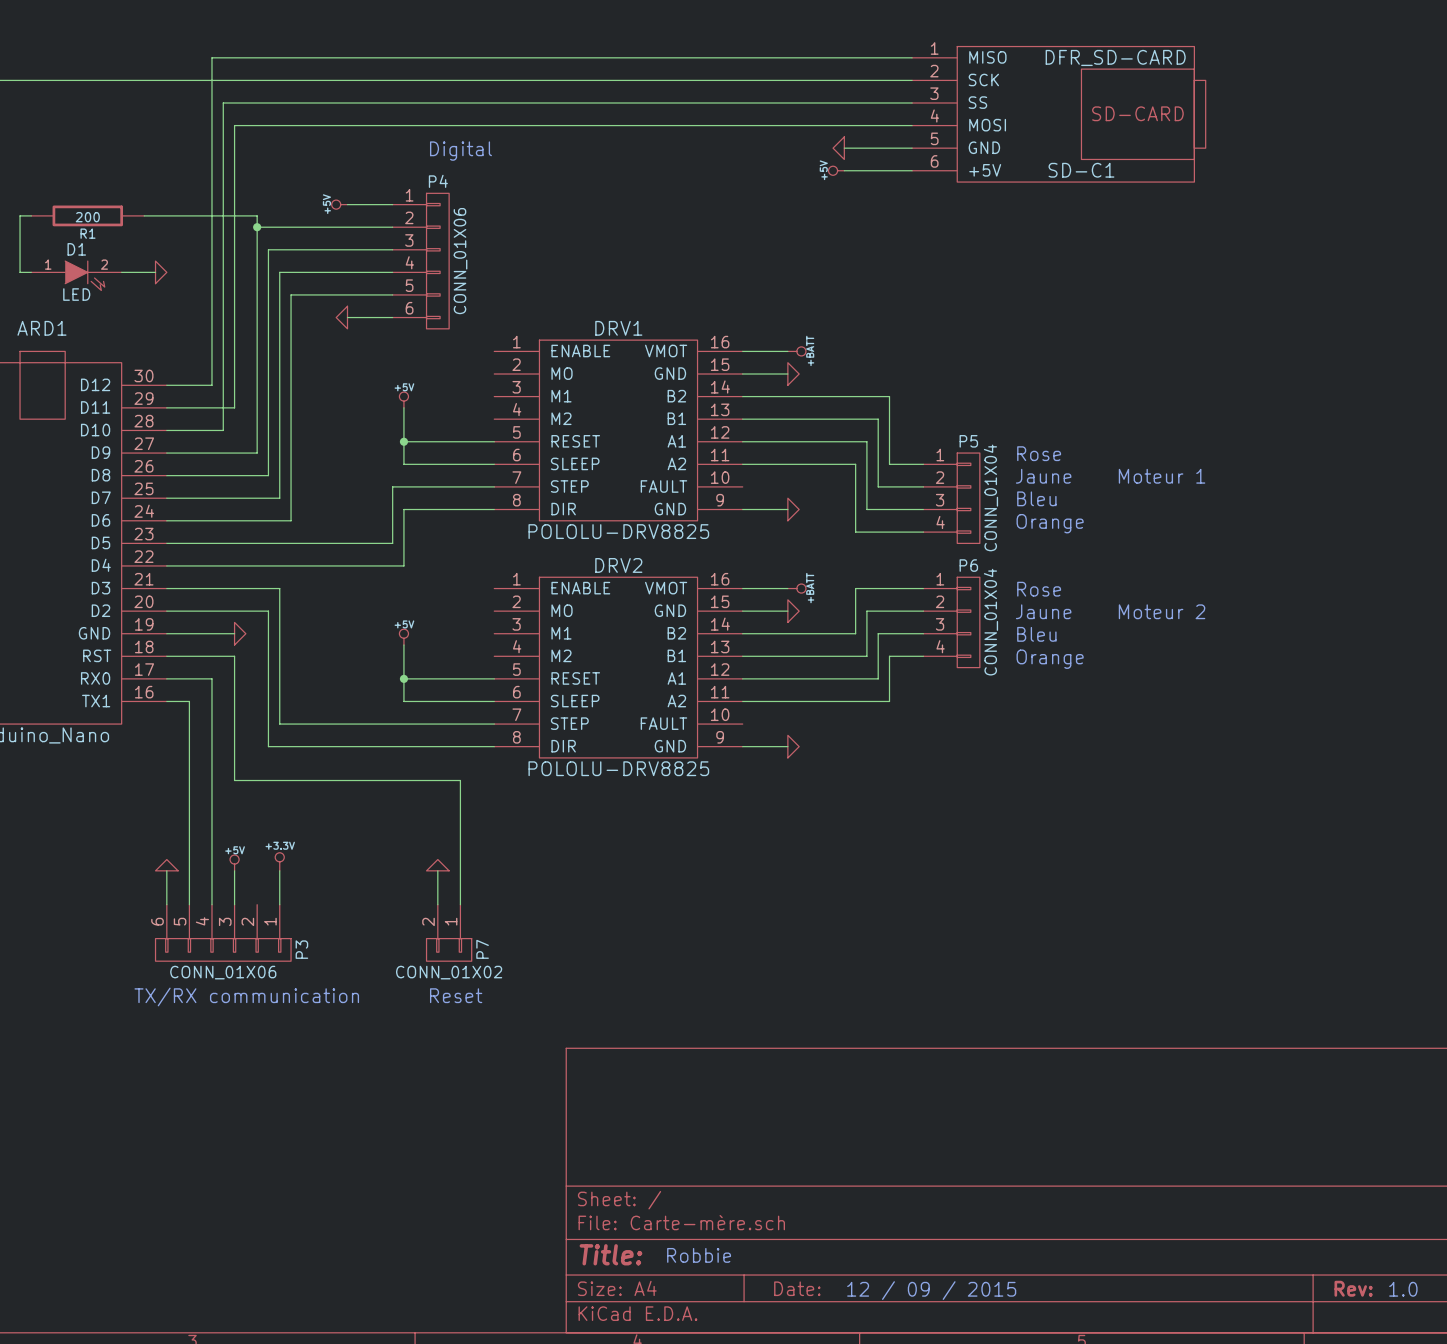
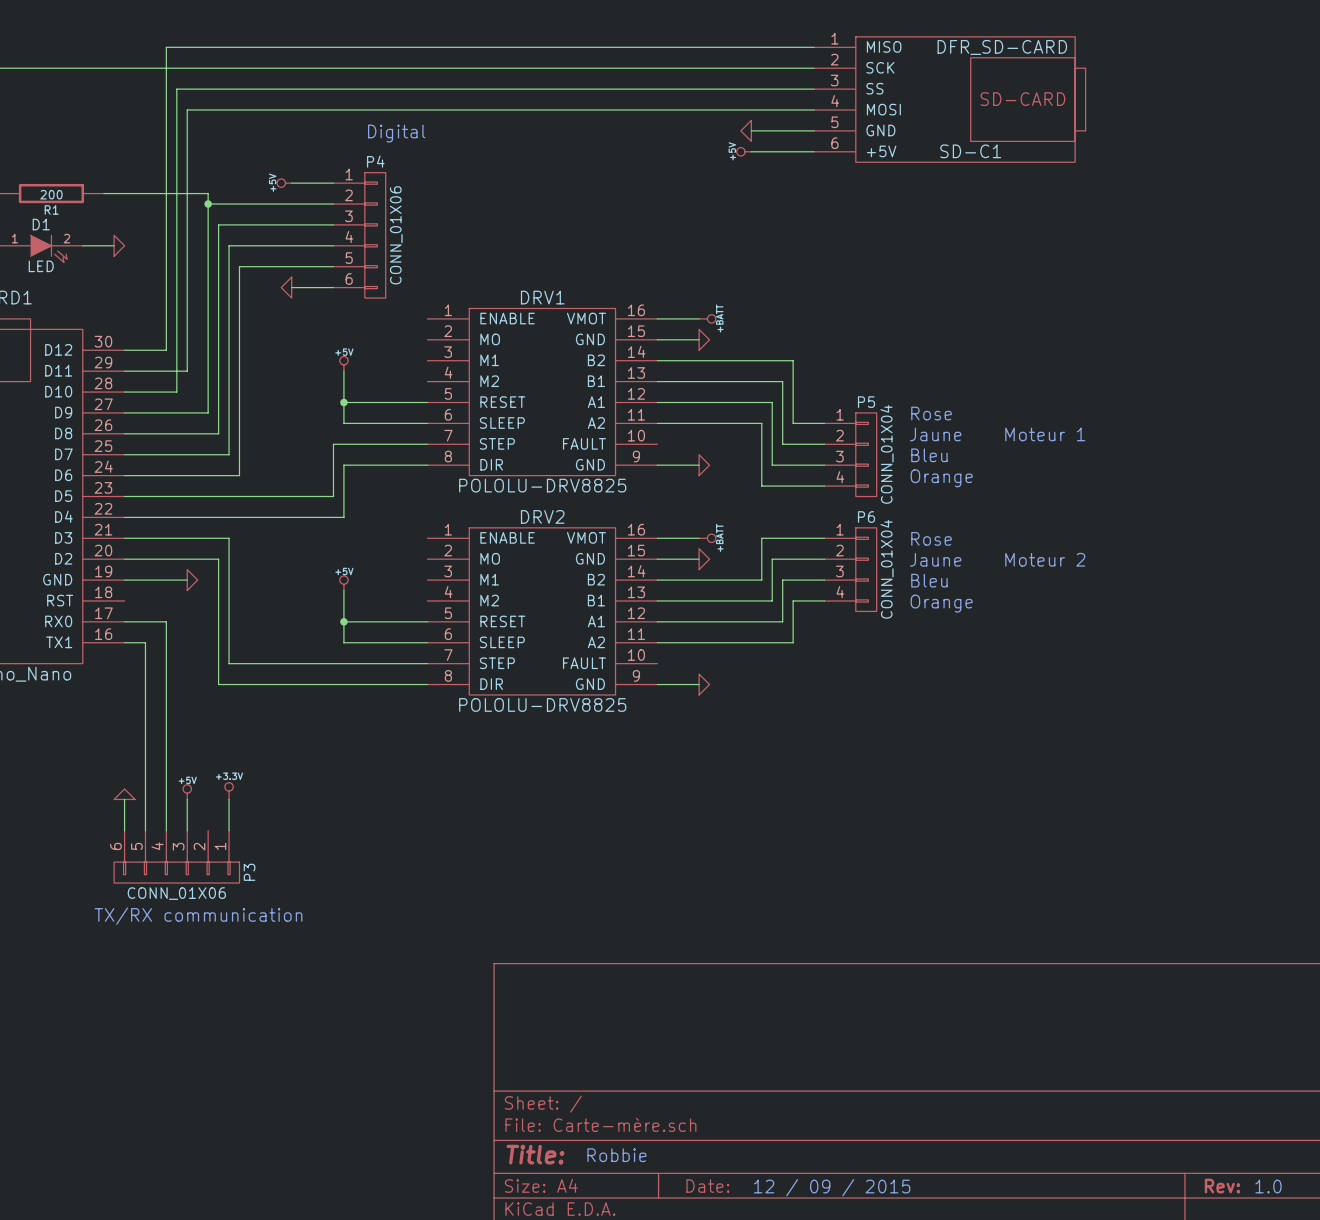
wire: (166, 656) (234, 656) (234, 780) (460, 780) (460, 904) -> none
power symbol: (437, 865) -> none
wire: (437, 870) (437, 904) -> none
P7: CONN_01X02 (449, 932) -> none
text: Reset (456, 995) -> none

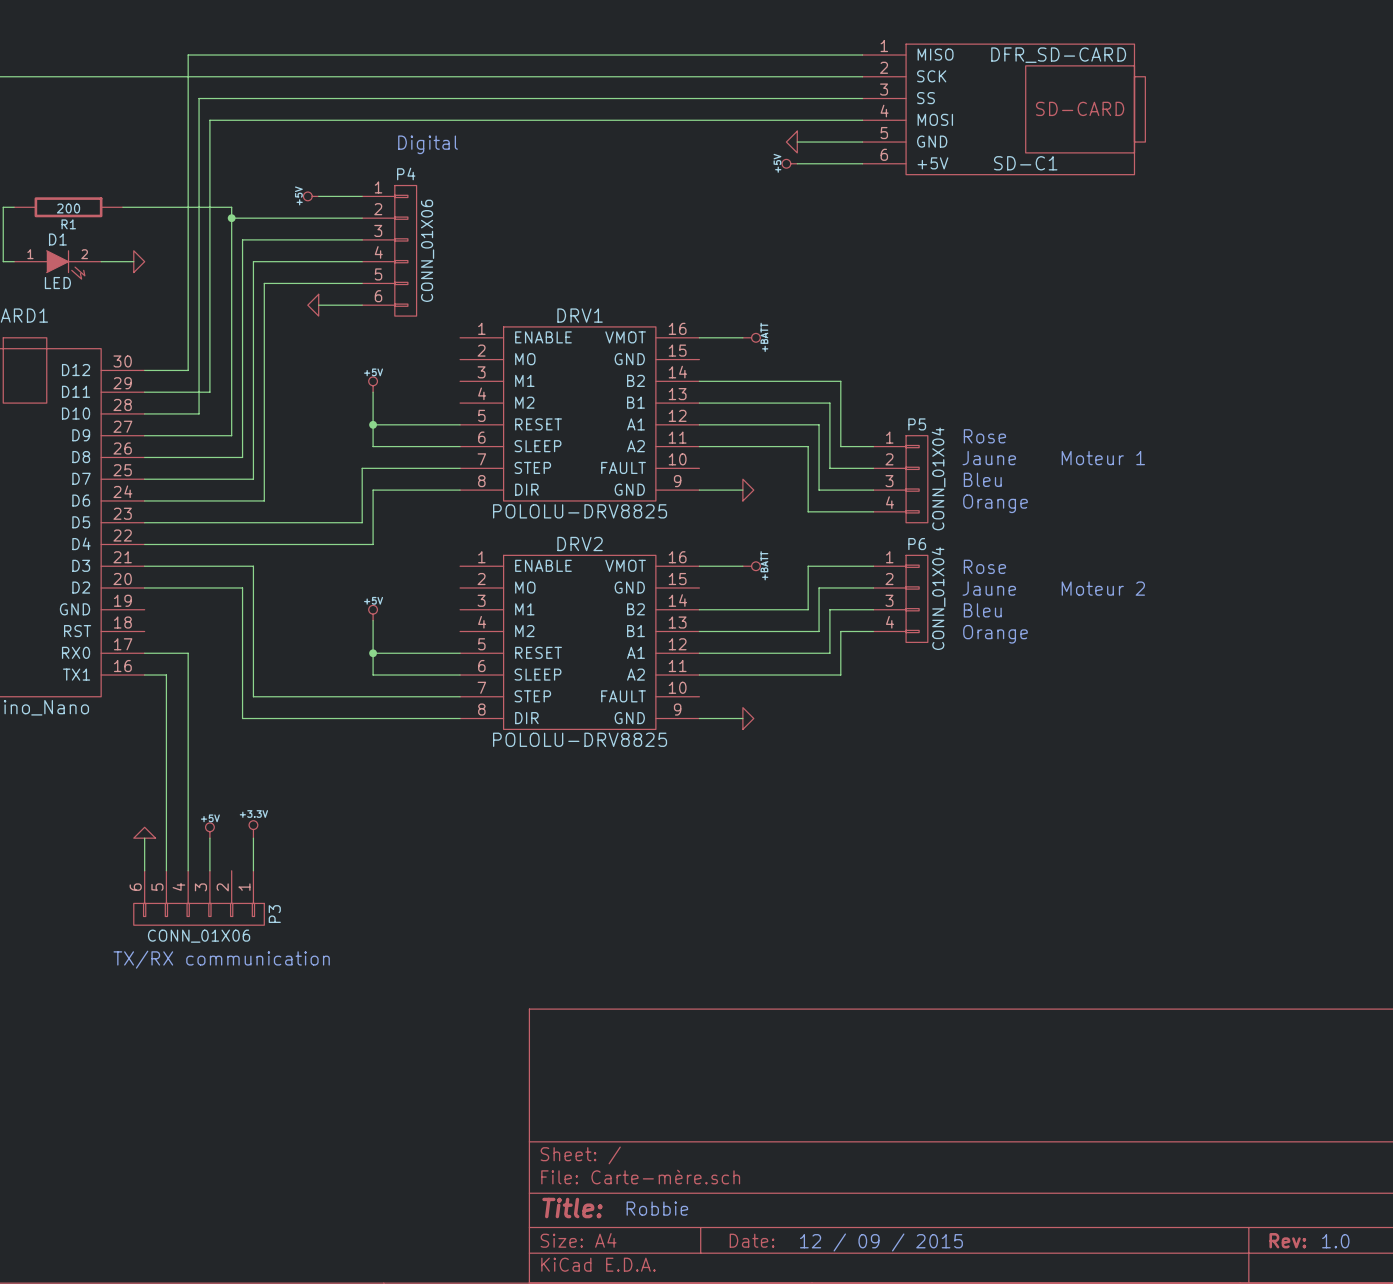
wire: (657, 339) (699, 339) -> none
power symbol: (704, 339) -> none
wire: (657, 559) (699, 559) -> none
power symbol: (704, 559) -> none
wire: (124, 580) (187, 580) -> none
power symbol: (192, 580) -> none

